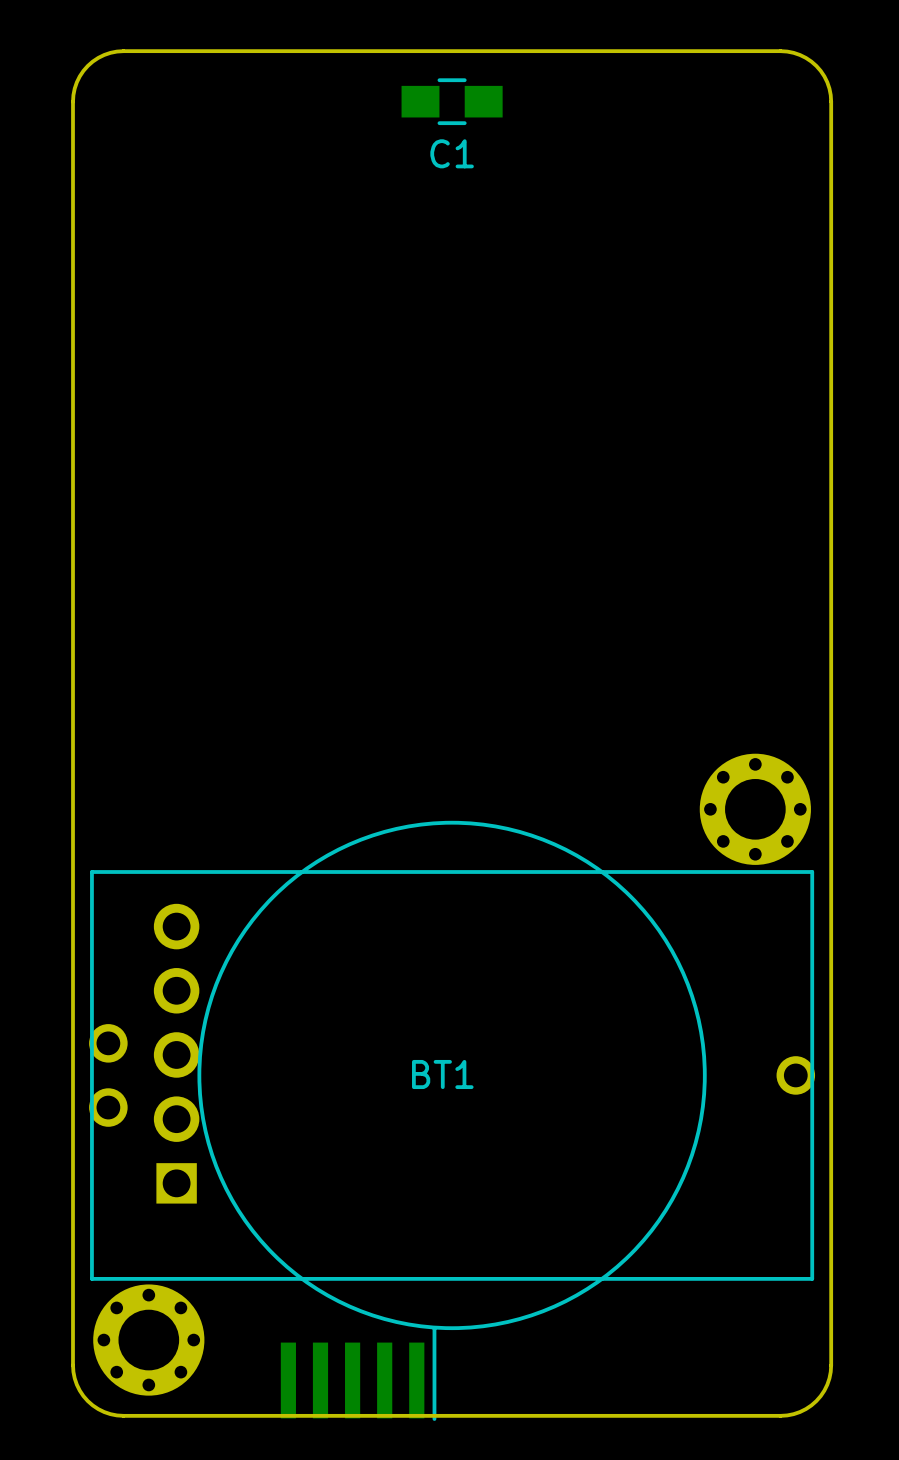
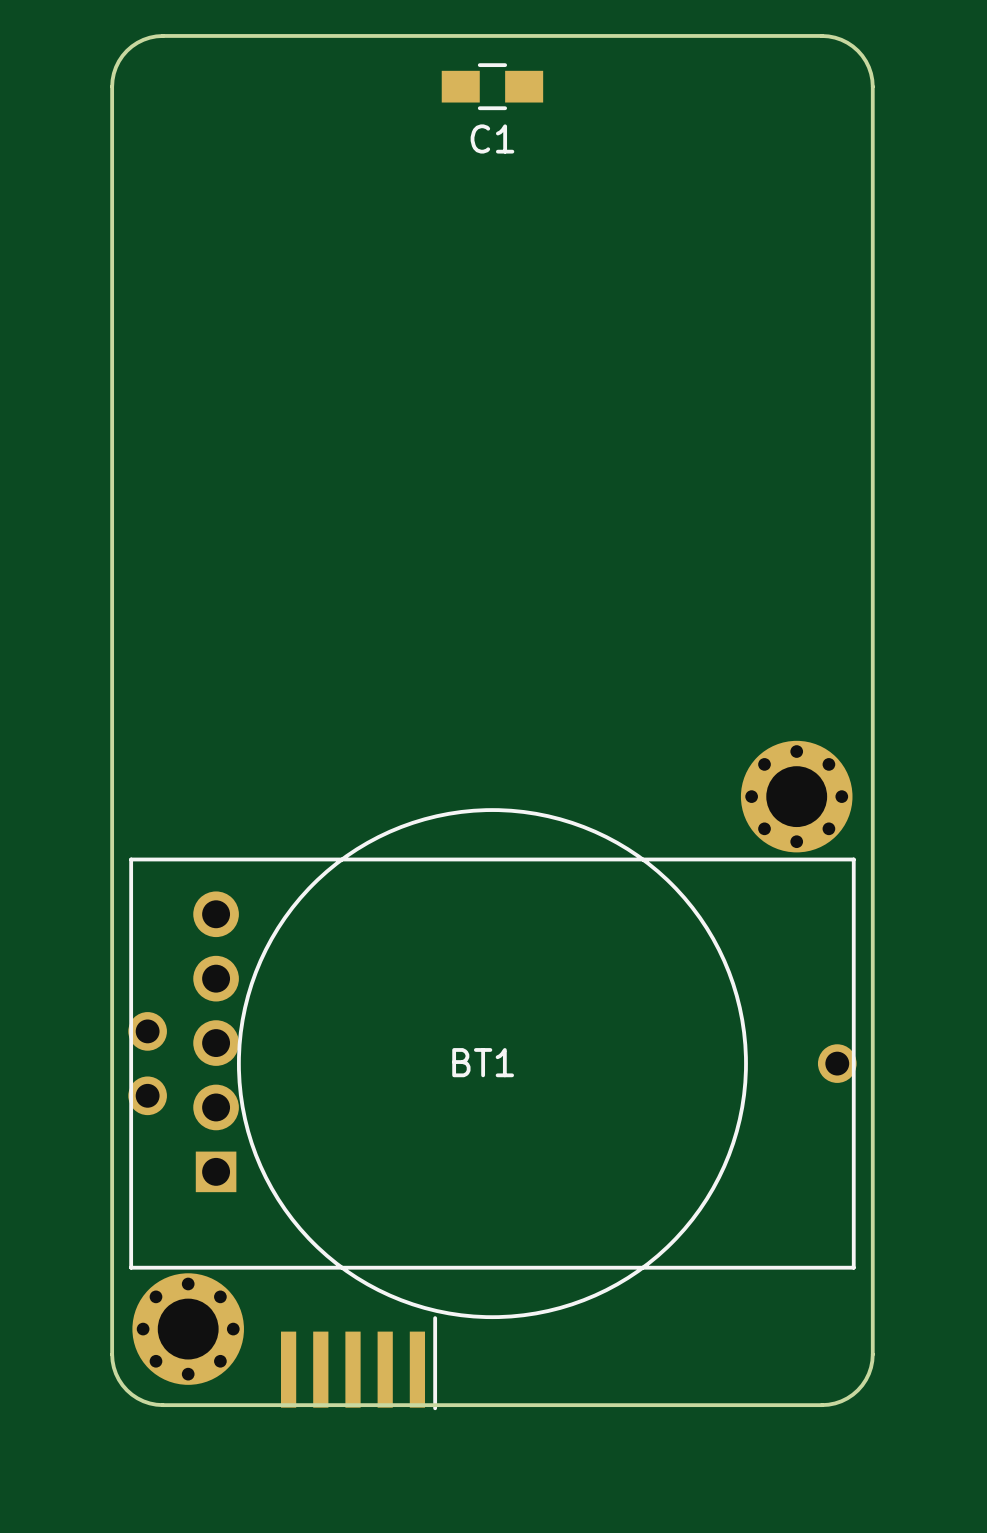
part position: (358, 1374) -> (359, 1363)

